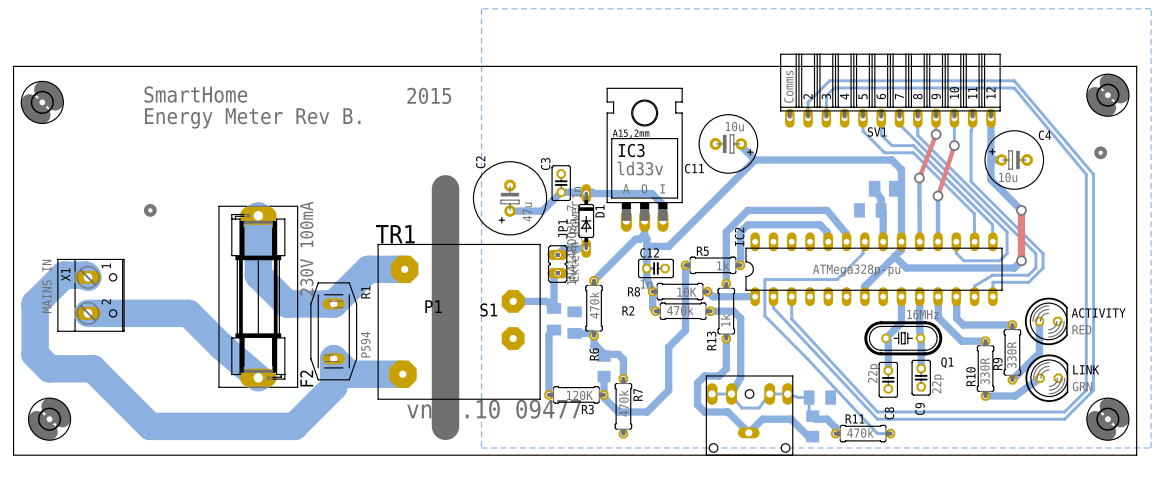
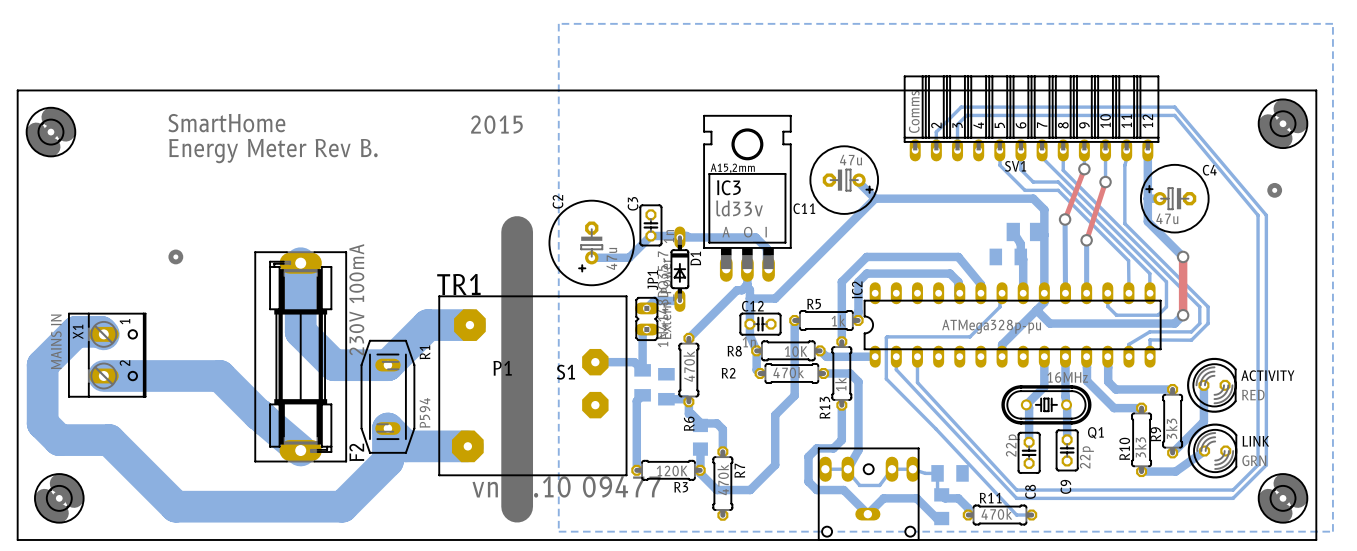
C11 value: 10u (734, 126) -> 47u (851, 160)
C4 value: 10u (1008, 177) -> 47u (1167, 218)
R9 value: 330R (1011, 354) -> 3k3 (1171, 428)
R10 value: 330R (985, 371) -> 3k3 (1140, 447)

